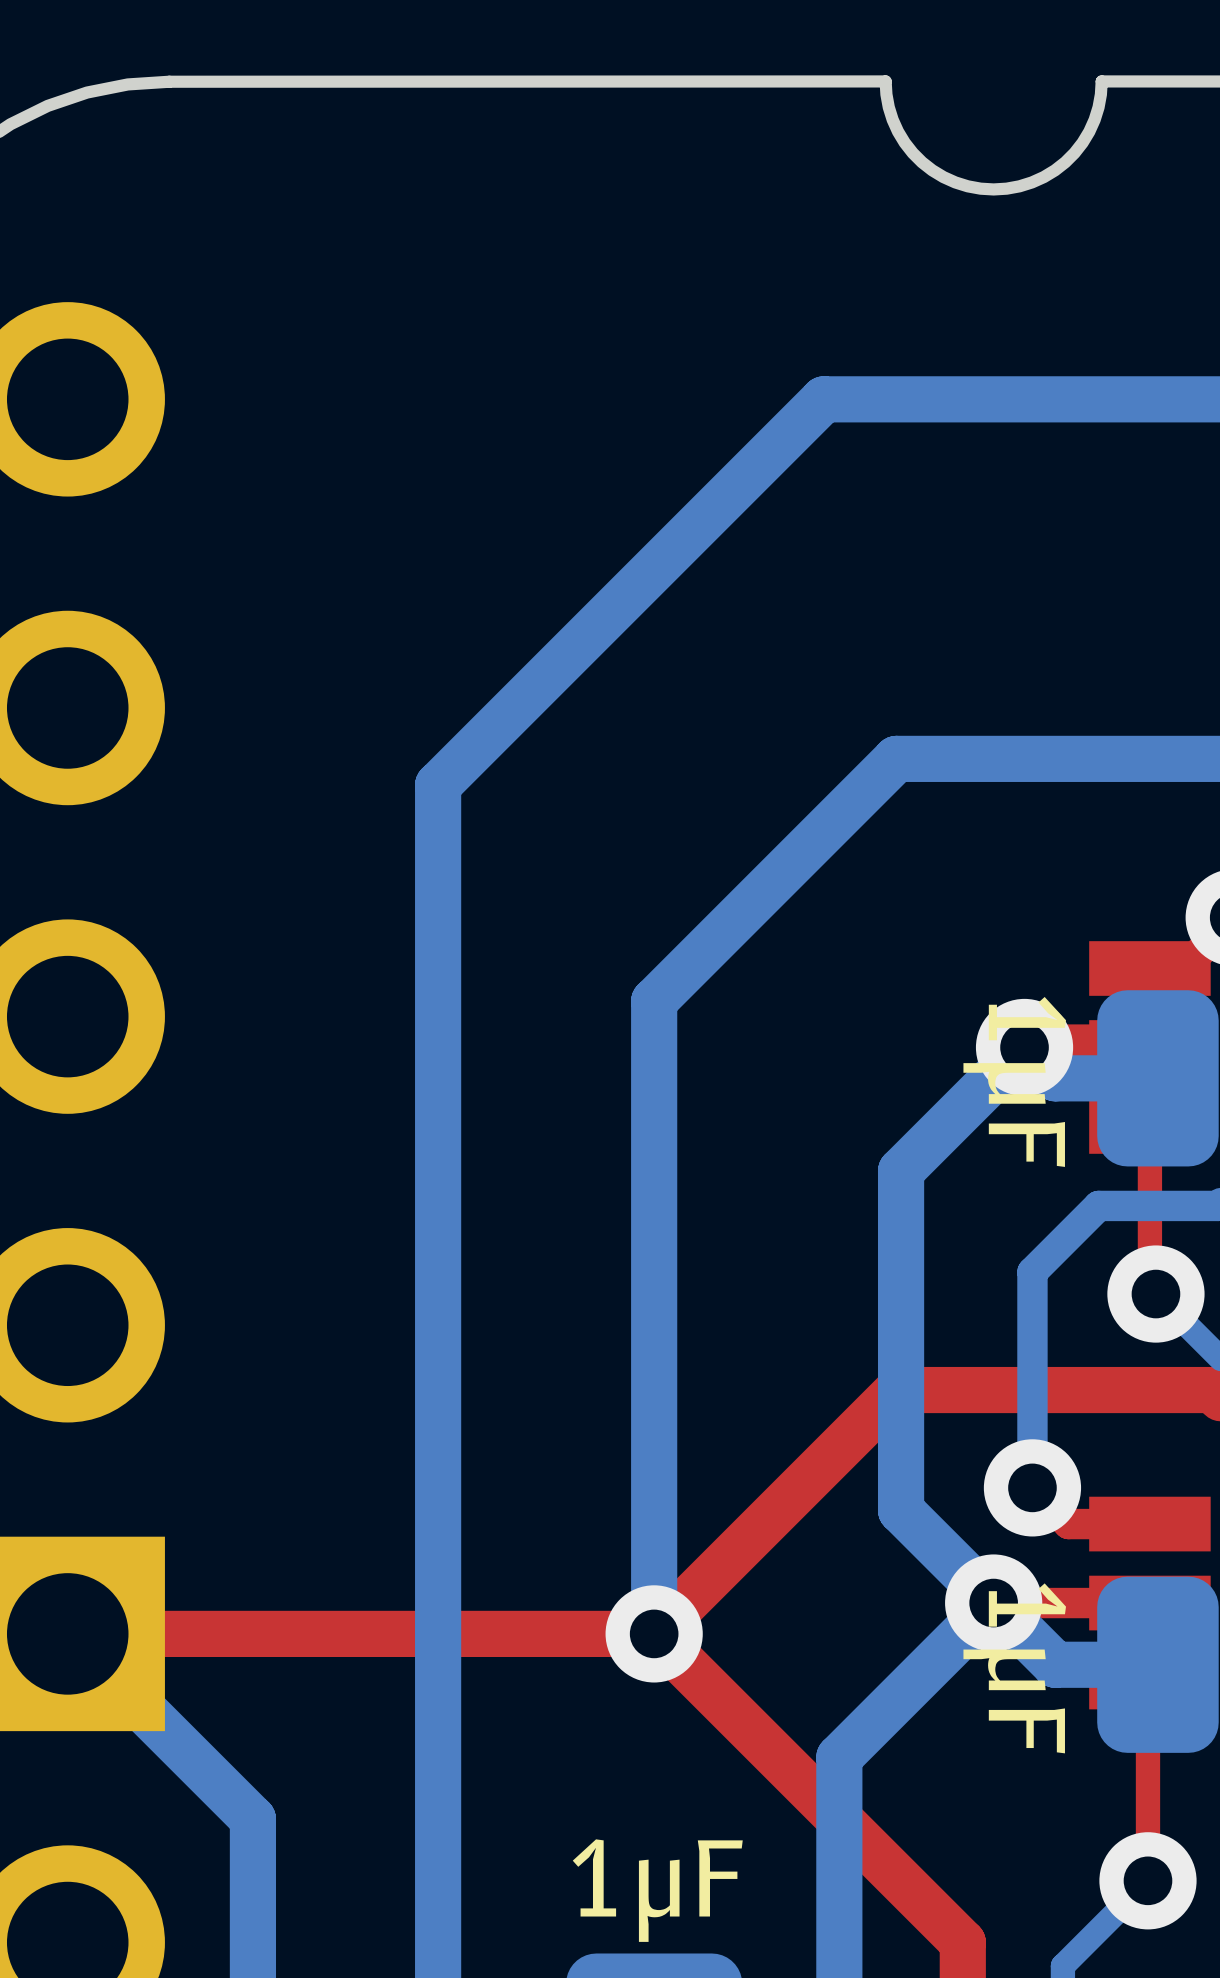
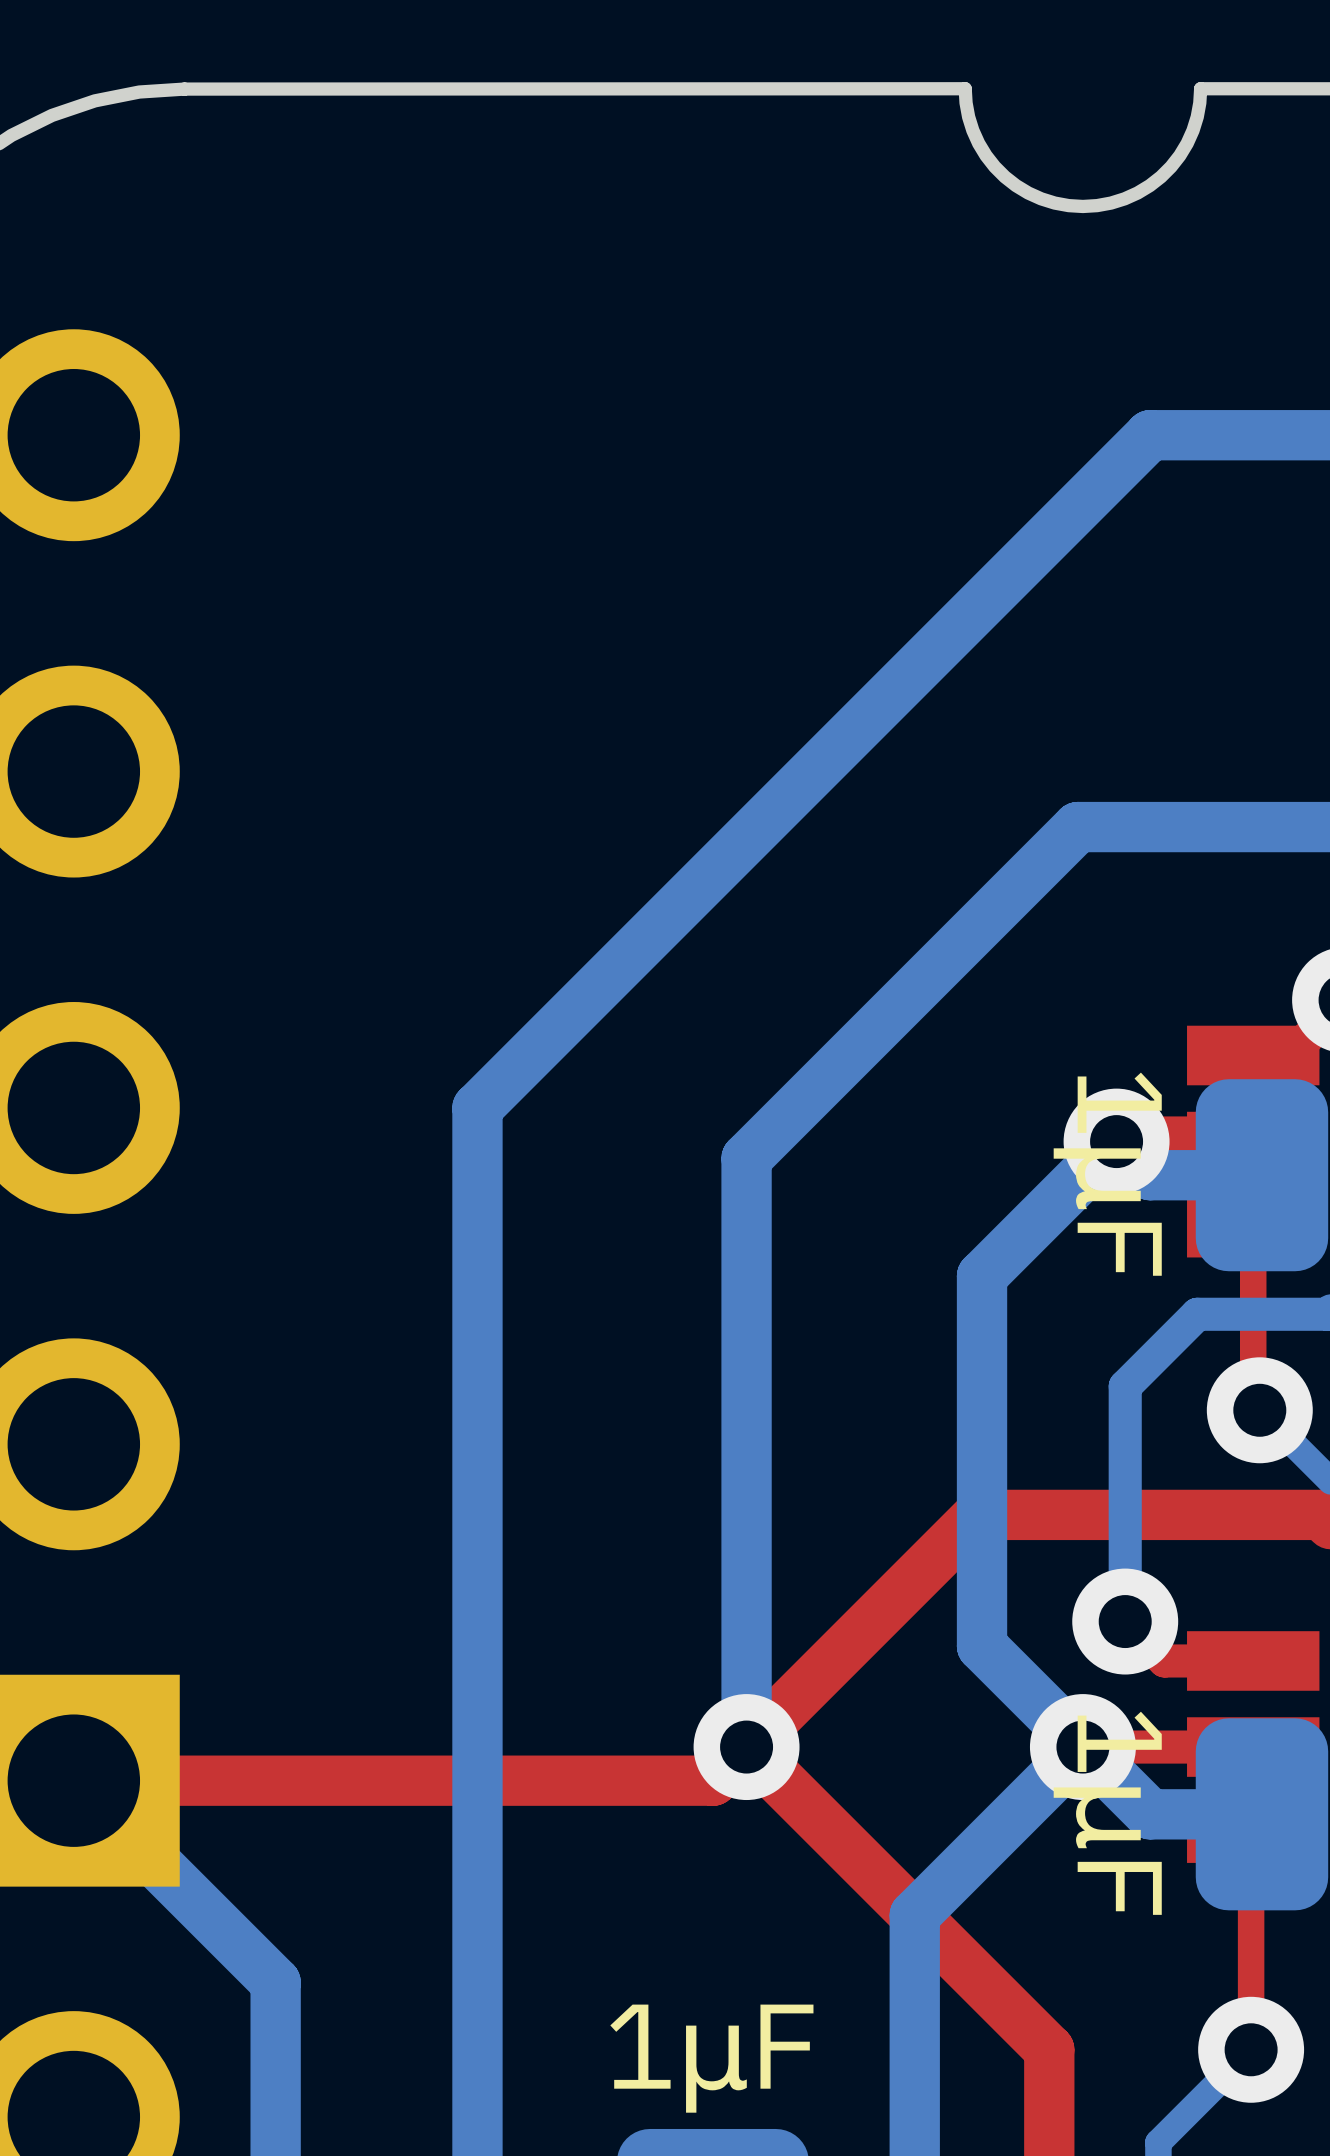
bottom track: (1055, 399) (823, 399) (438, 785) (438, 1016) -> (1150, 435) (477, 1107)
bottom track: (989, 758) (896, 758) (654, 1001) (654, 1633) -> (1077, 827) (746, 1158) (746, 1747)
top track: (654, 1633) (962, 1942) -> (746, 1747) (1049, 2049) (1049, 2117)
via position: (654, 1633) -> (746, 1747)

